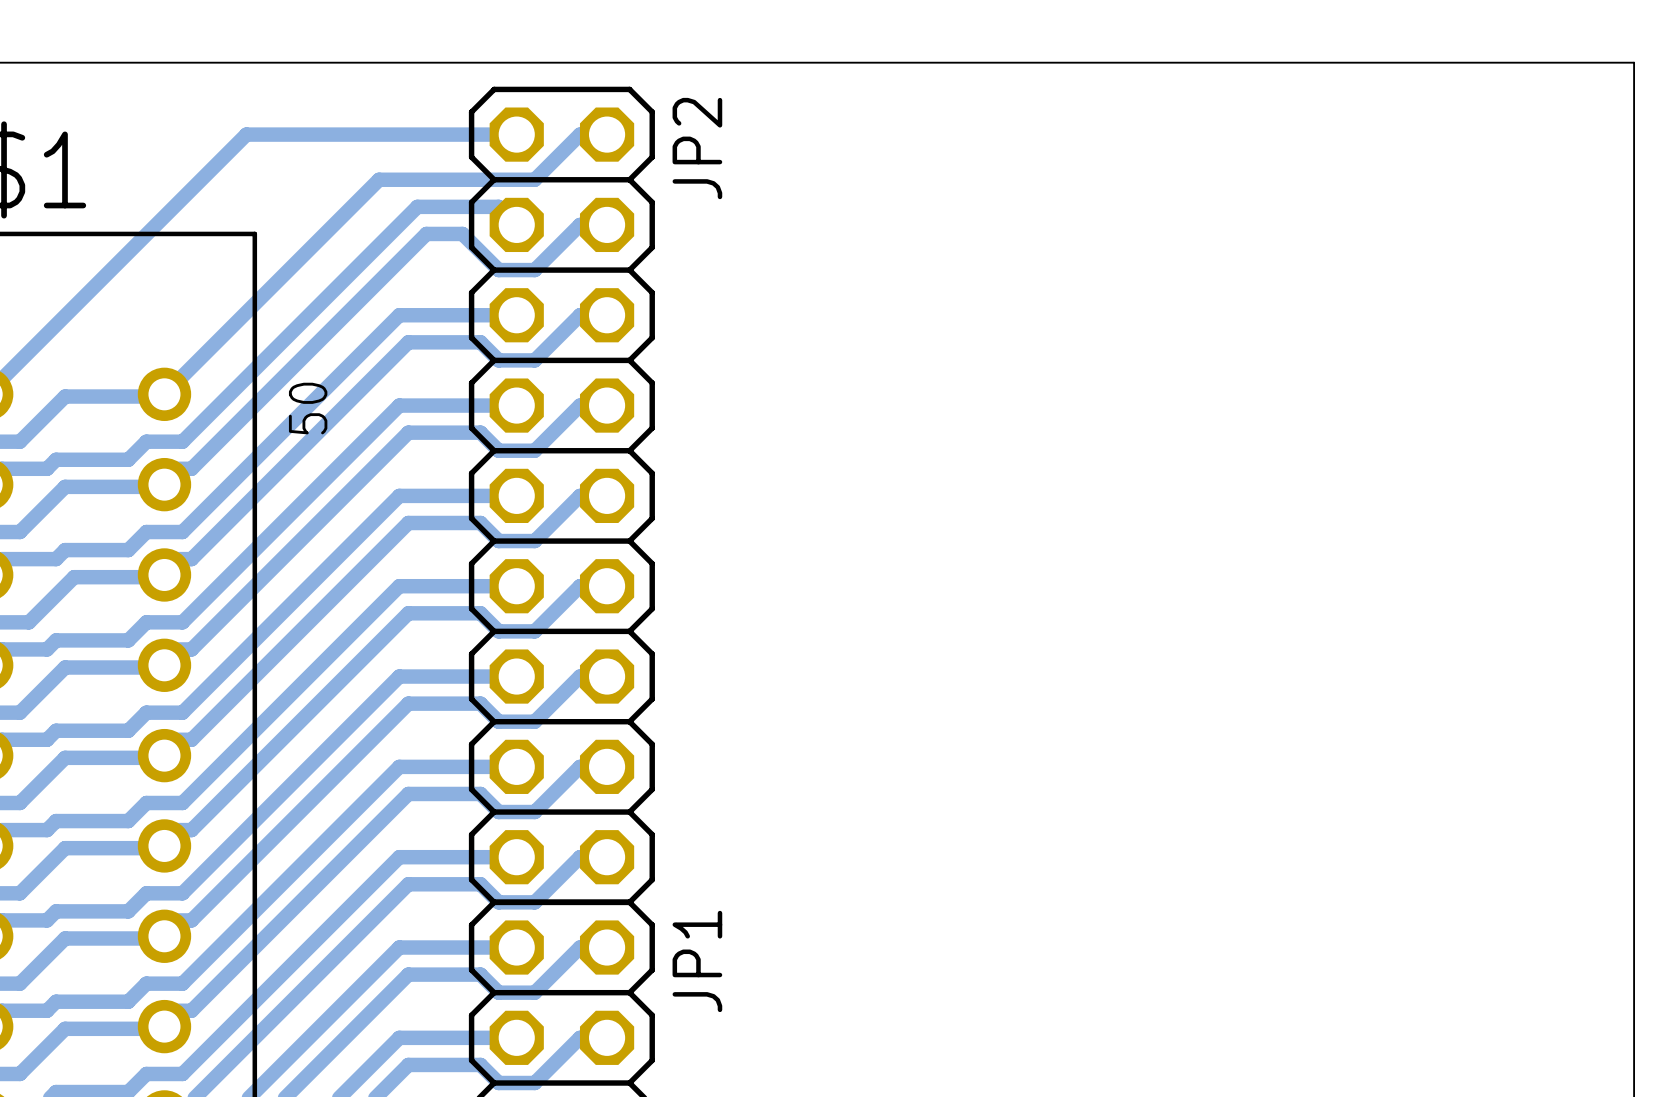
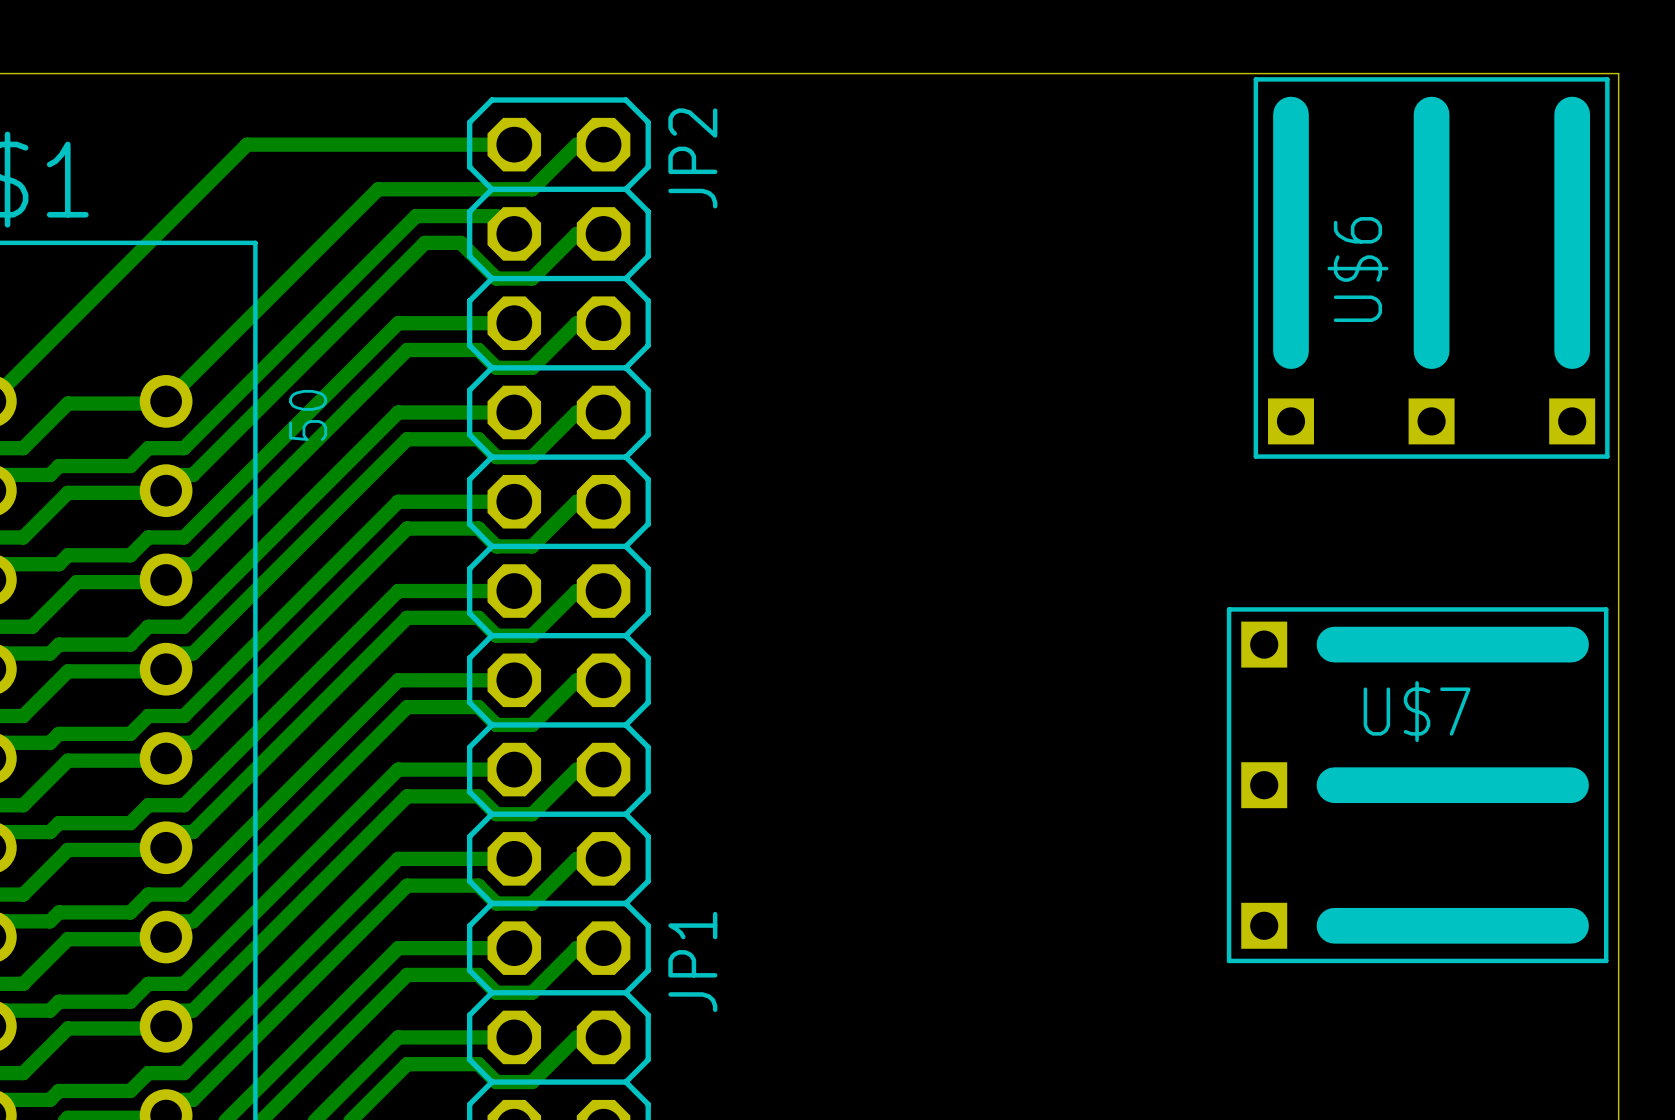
U$6: none -> (1431, 267)
U$7: none -> (1417, 785)

